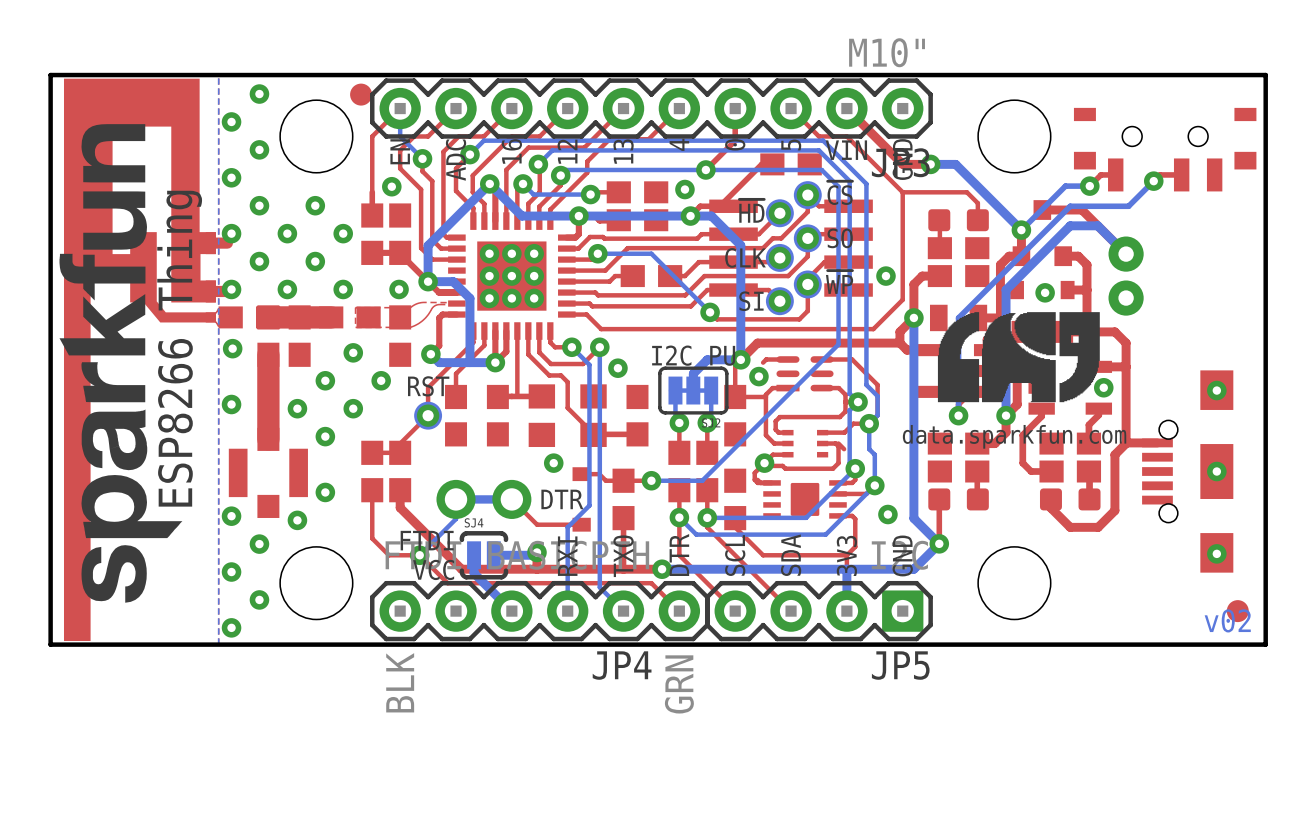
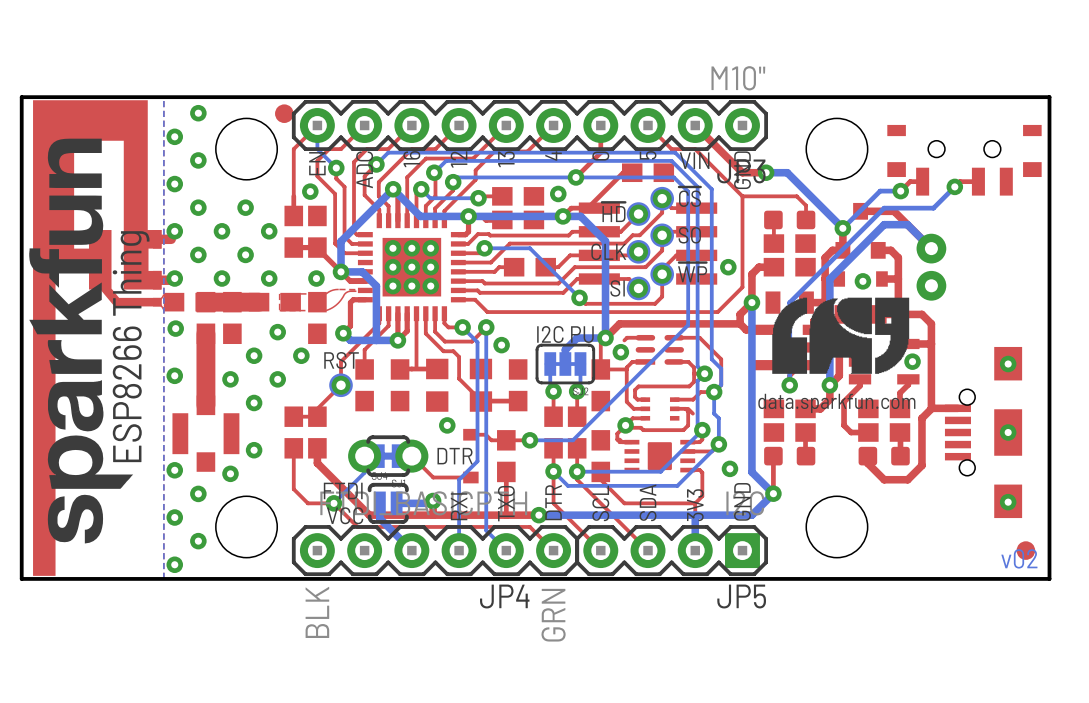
part: none -> (388, 456)

